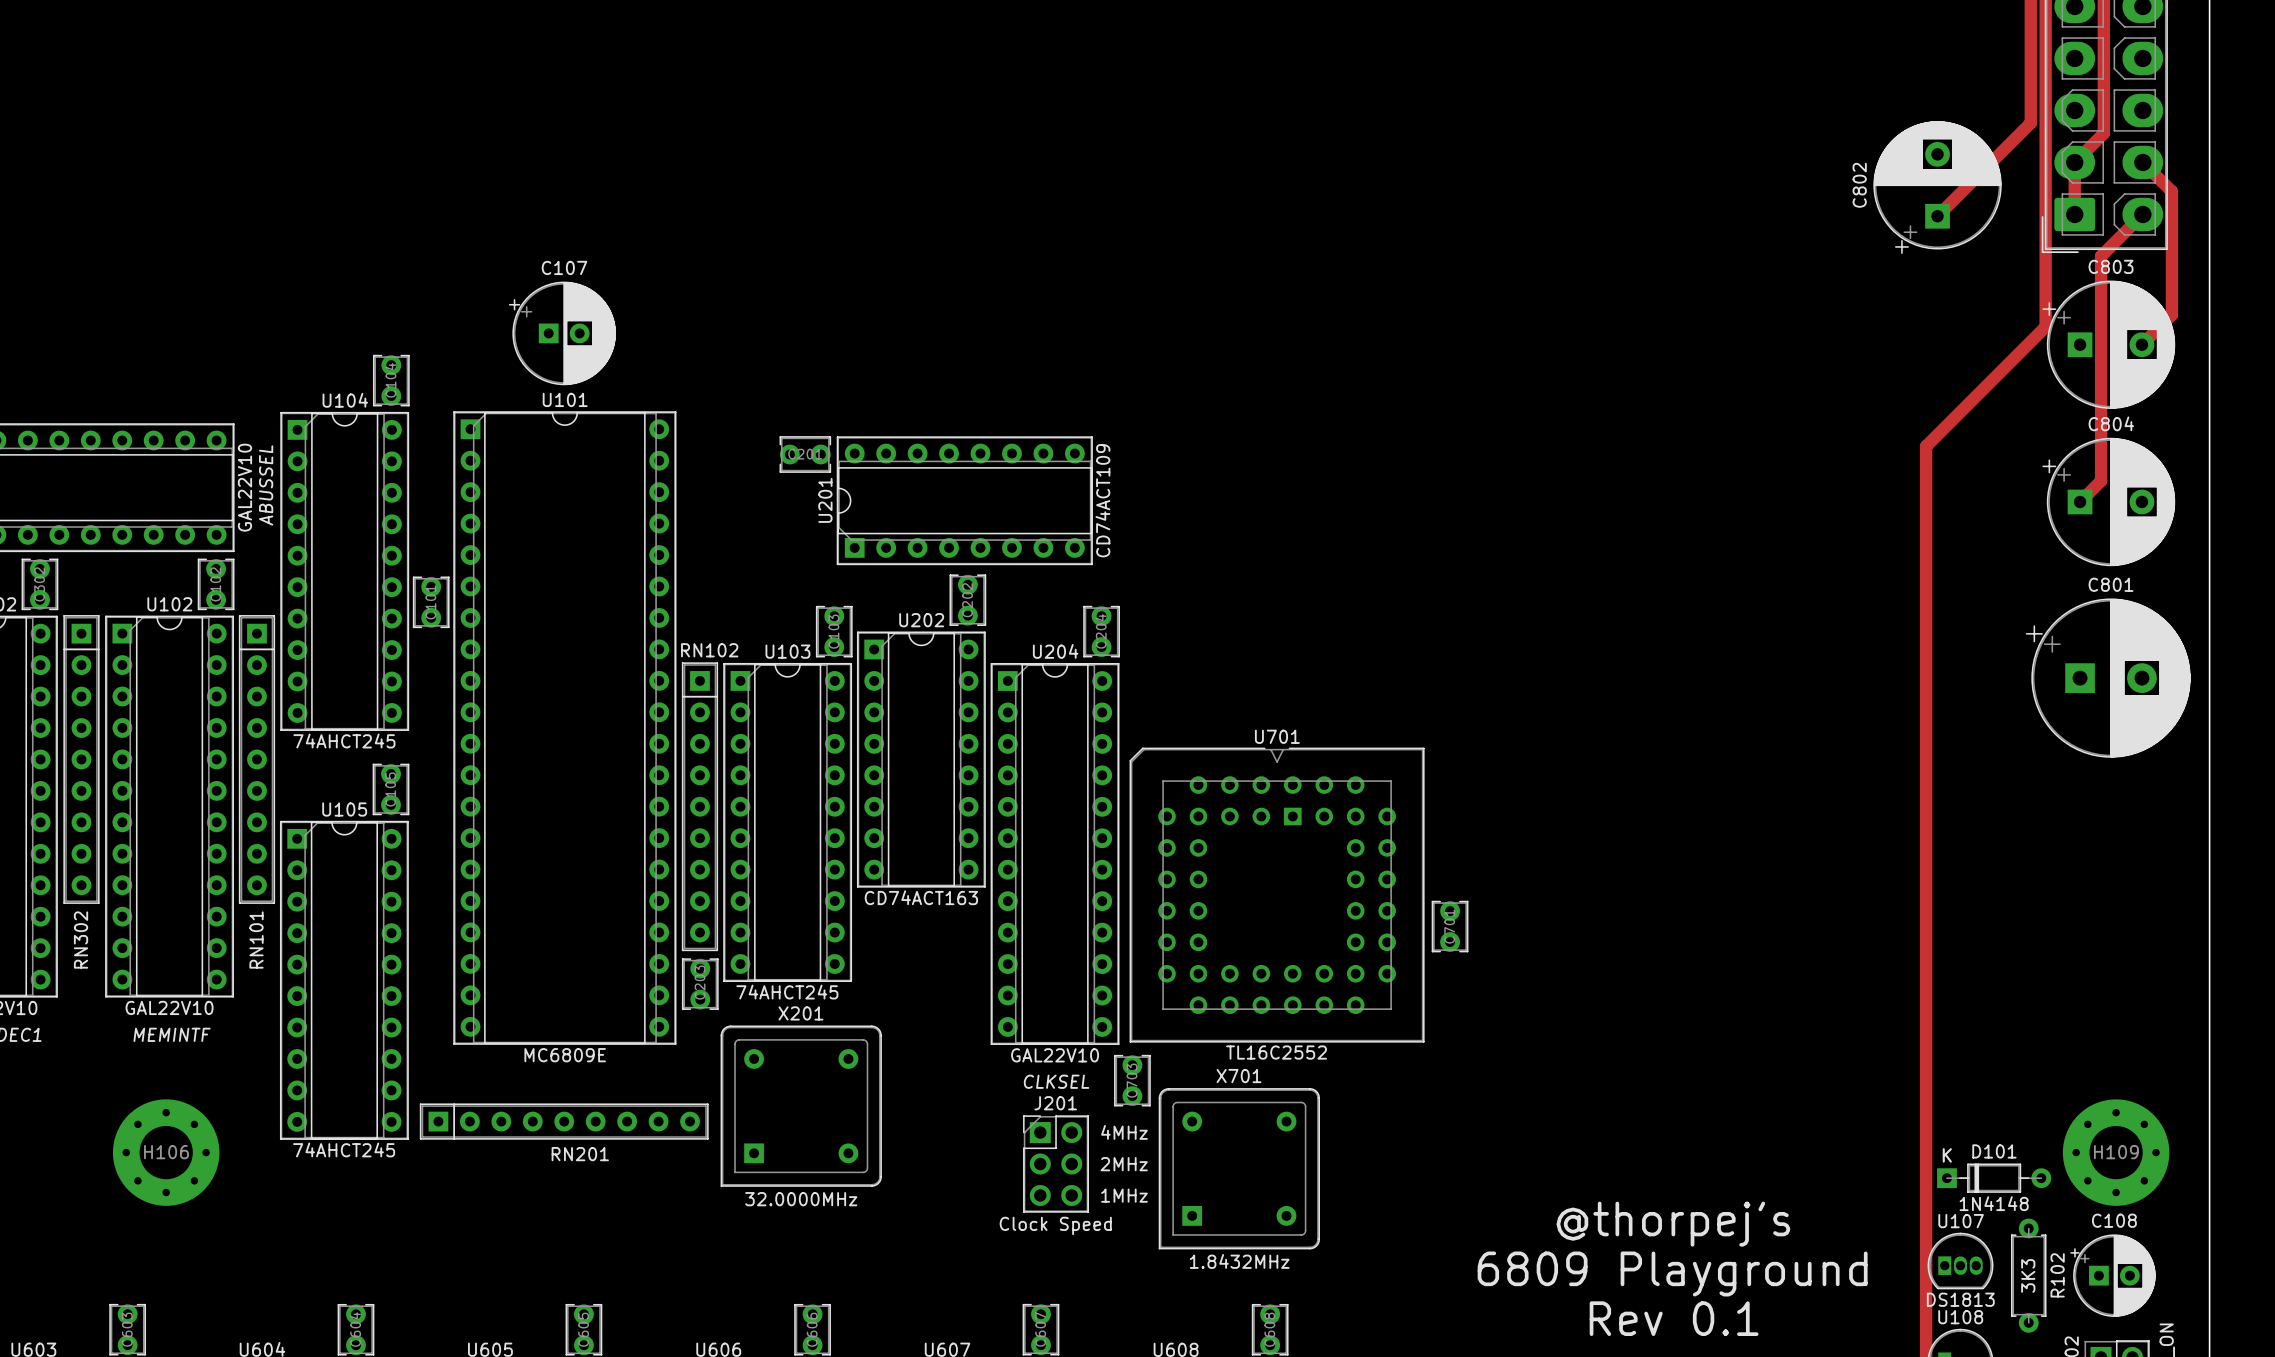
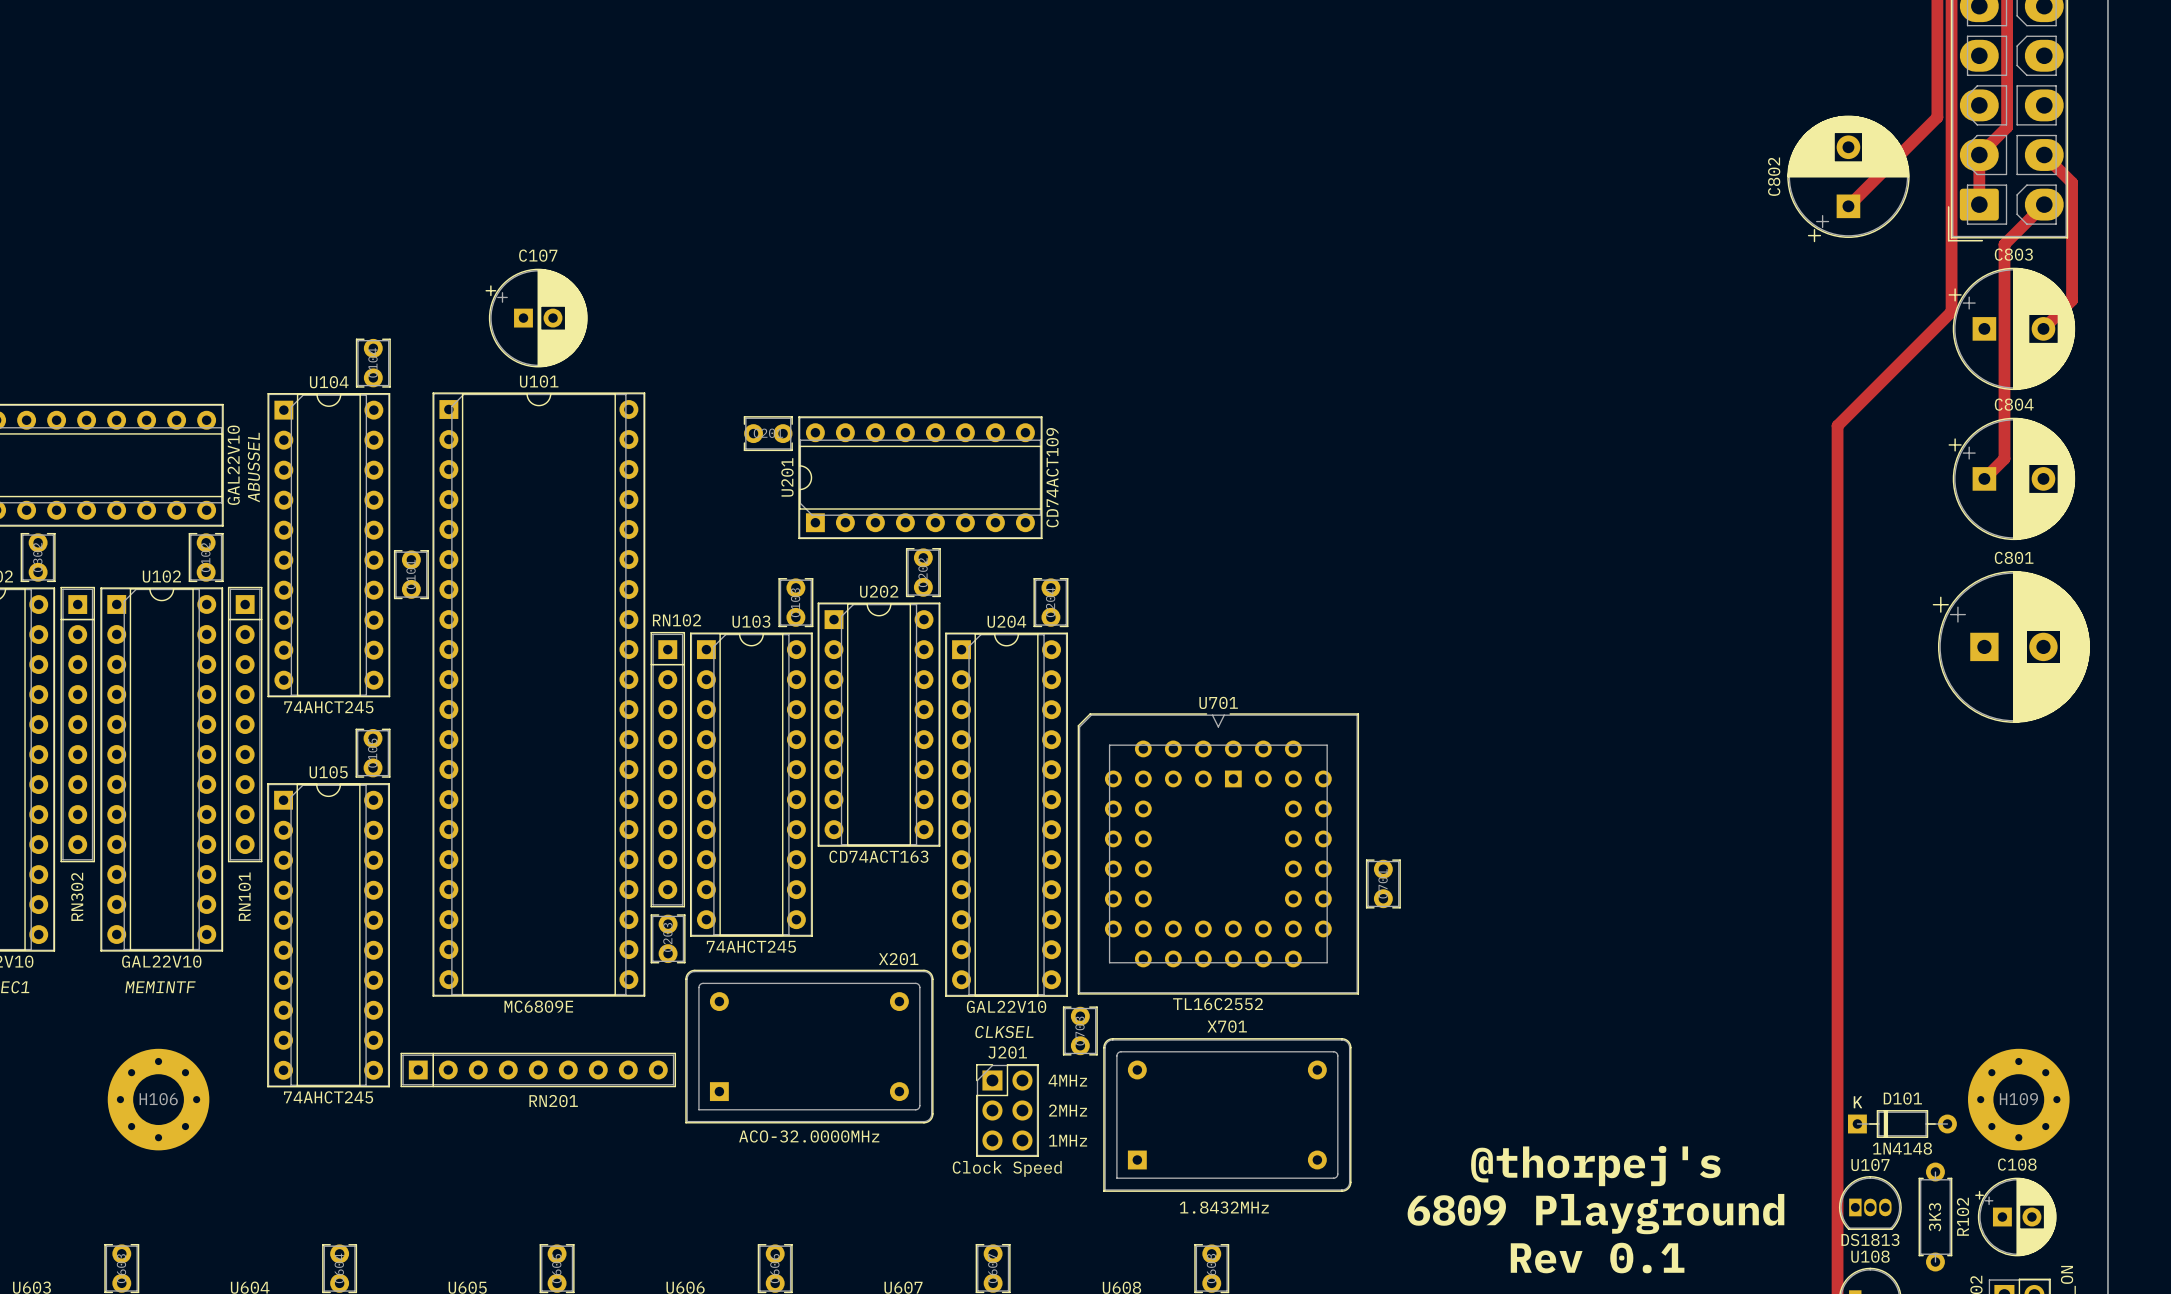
X201 name position: X201 (800, 1013) -> X201 (898, 959)
X201 footprint: [720, 1025, 882, 1187] -> [685, 969, 934, 1124]
X701 footprint: [1158, 1088, 1320, 1250] -> [1103, 1038, 1352, 1192]
X201 value: 32.0000MHz (801, 1199) -> ACO-32.0000MHz (809, 1136)

